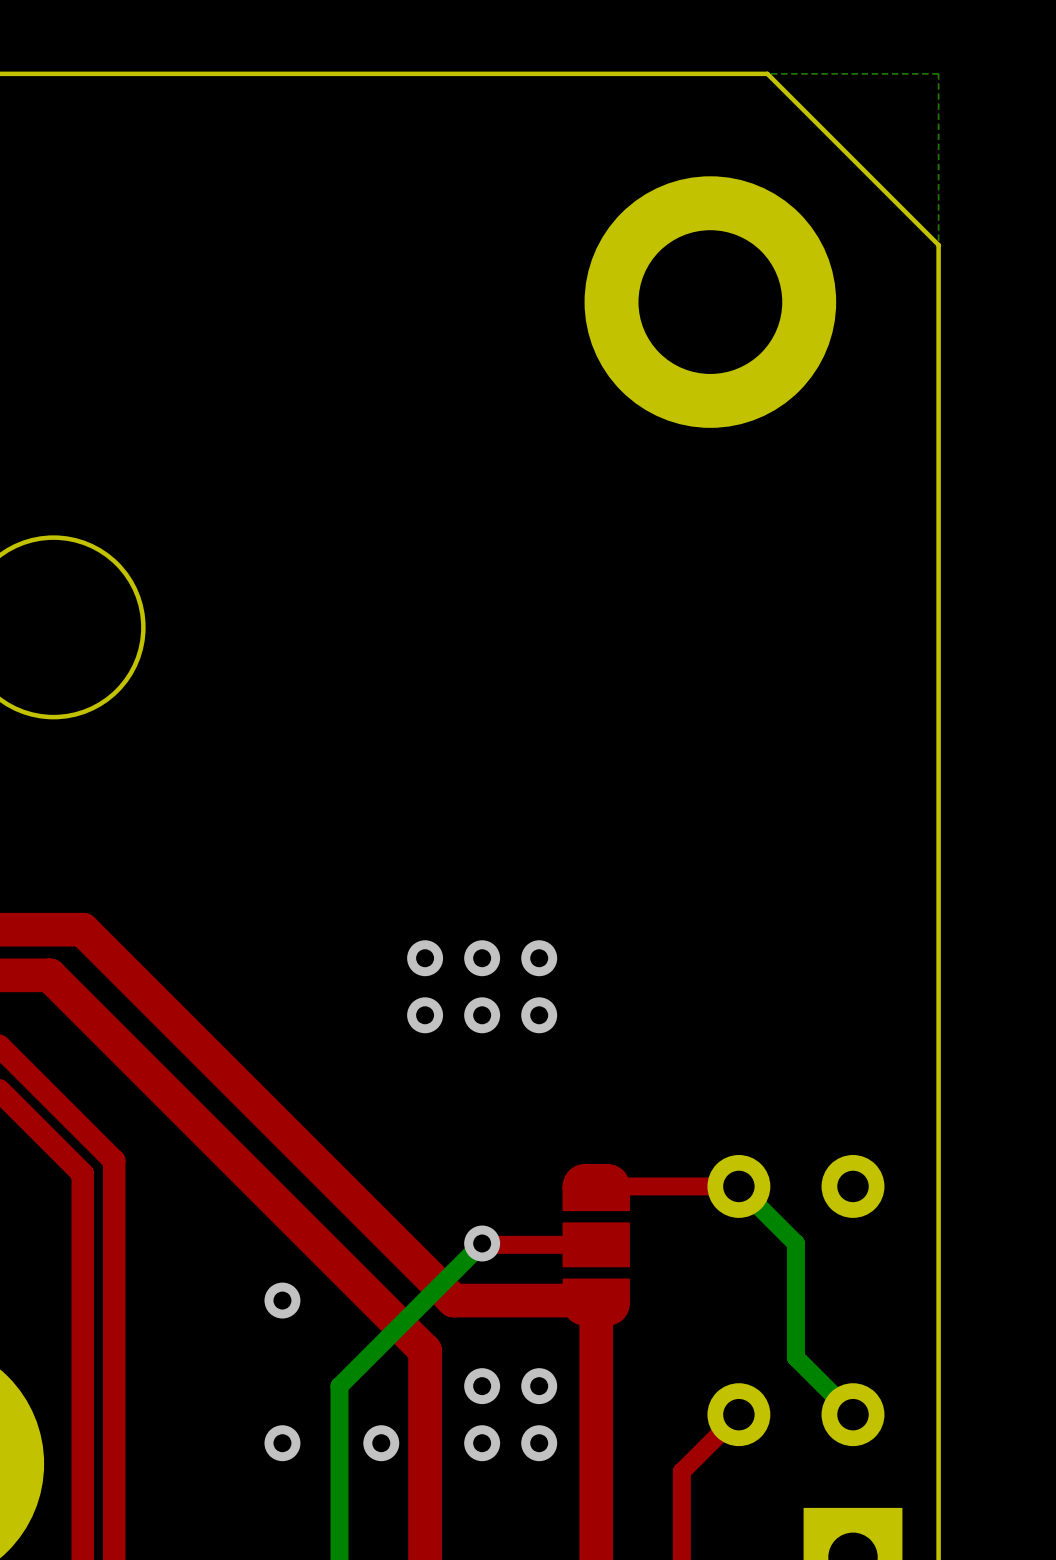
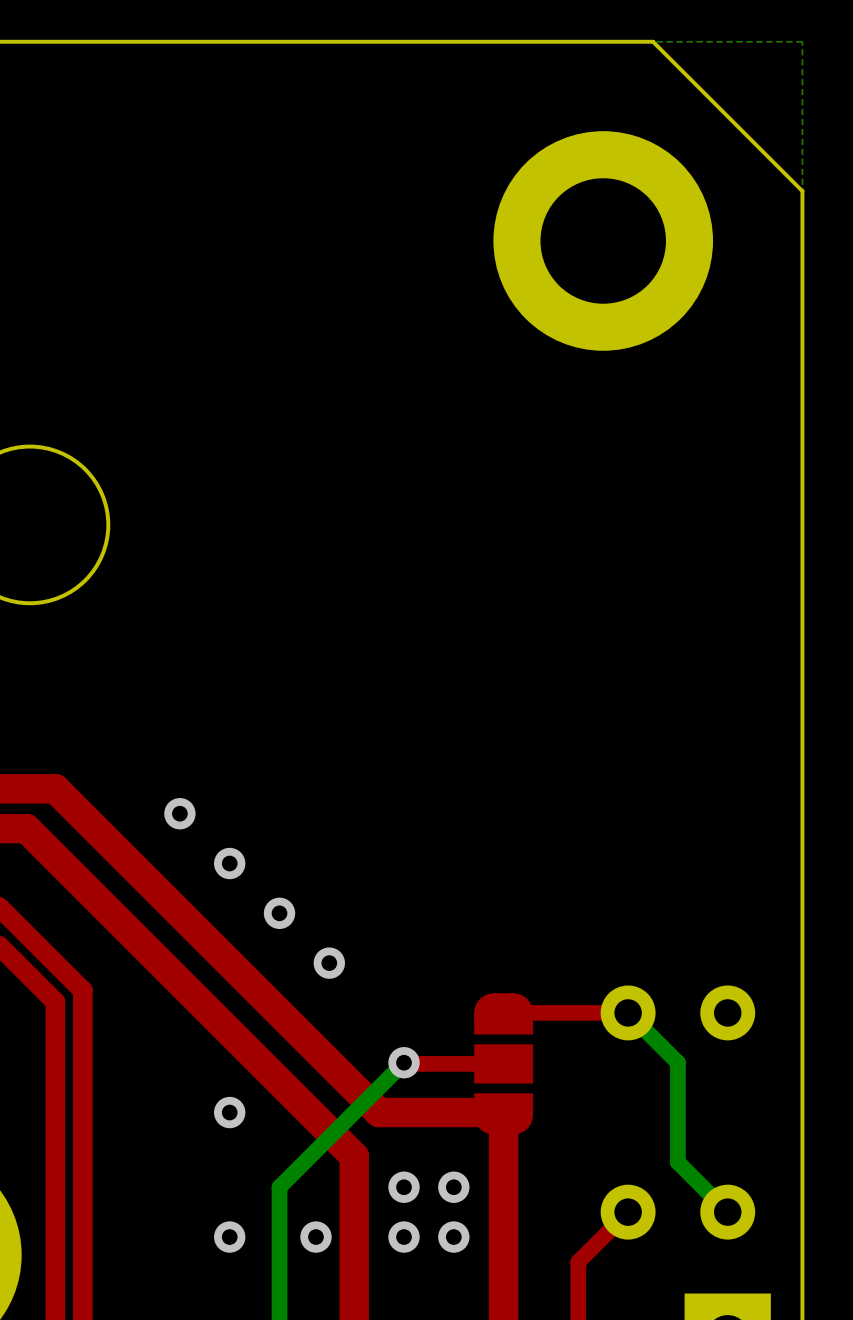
via: none -> (179, 813)
via: (425, 958) -> none
via: (482, 958) -> none
via: (539, 958) -> none
via: none -> (229, 863)
via: (425, 1015) -> none
via: (482, 1015) -> none
via: (539, 1015) -> none
via: none -> (279, 913)
via: none -> (329, 963)

